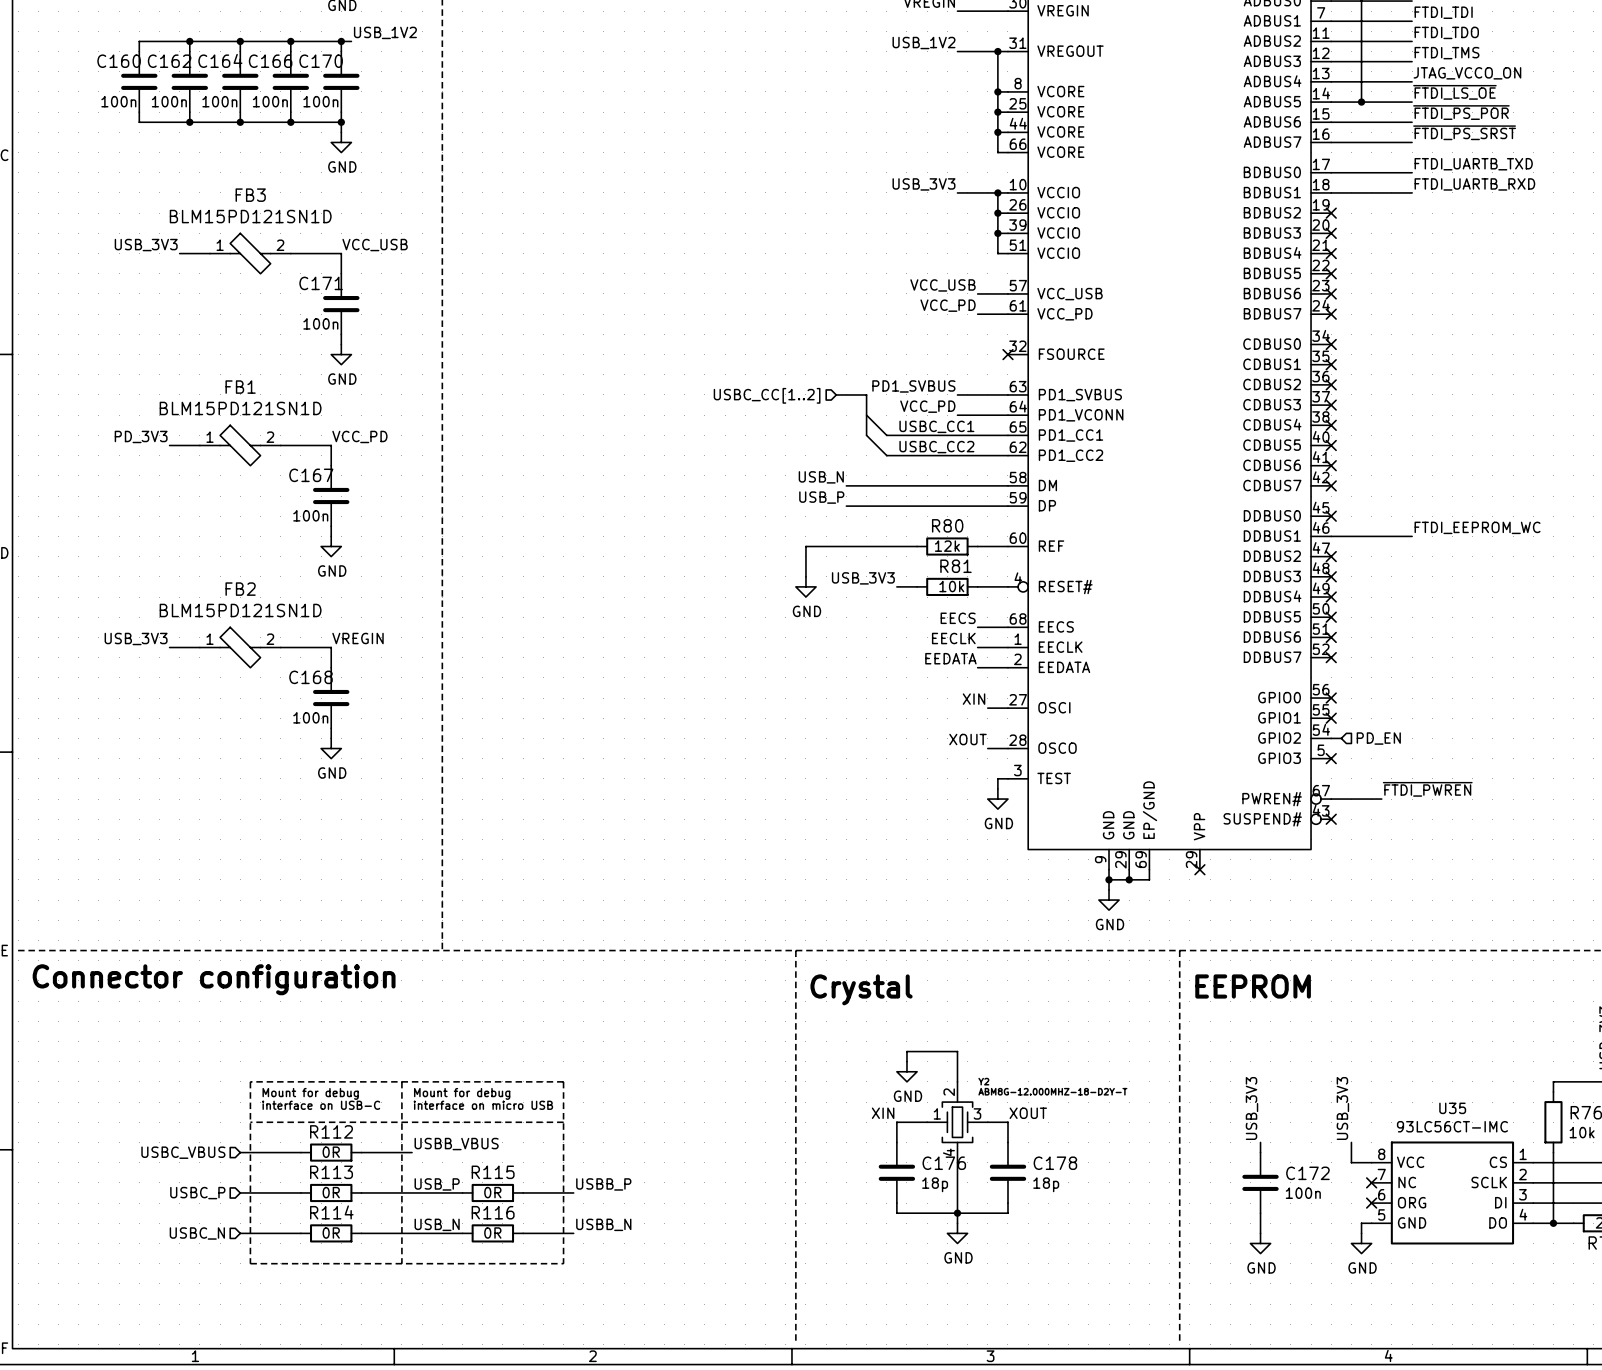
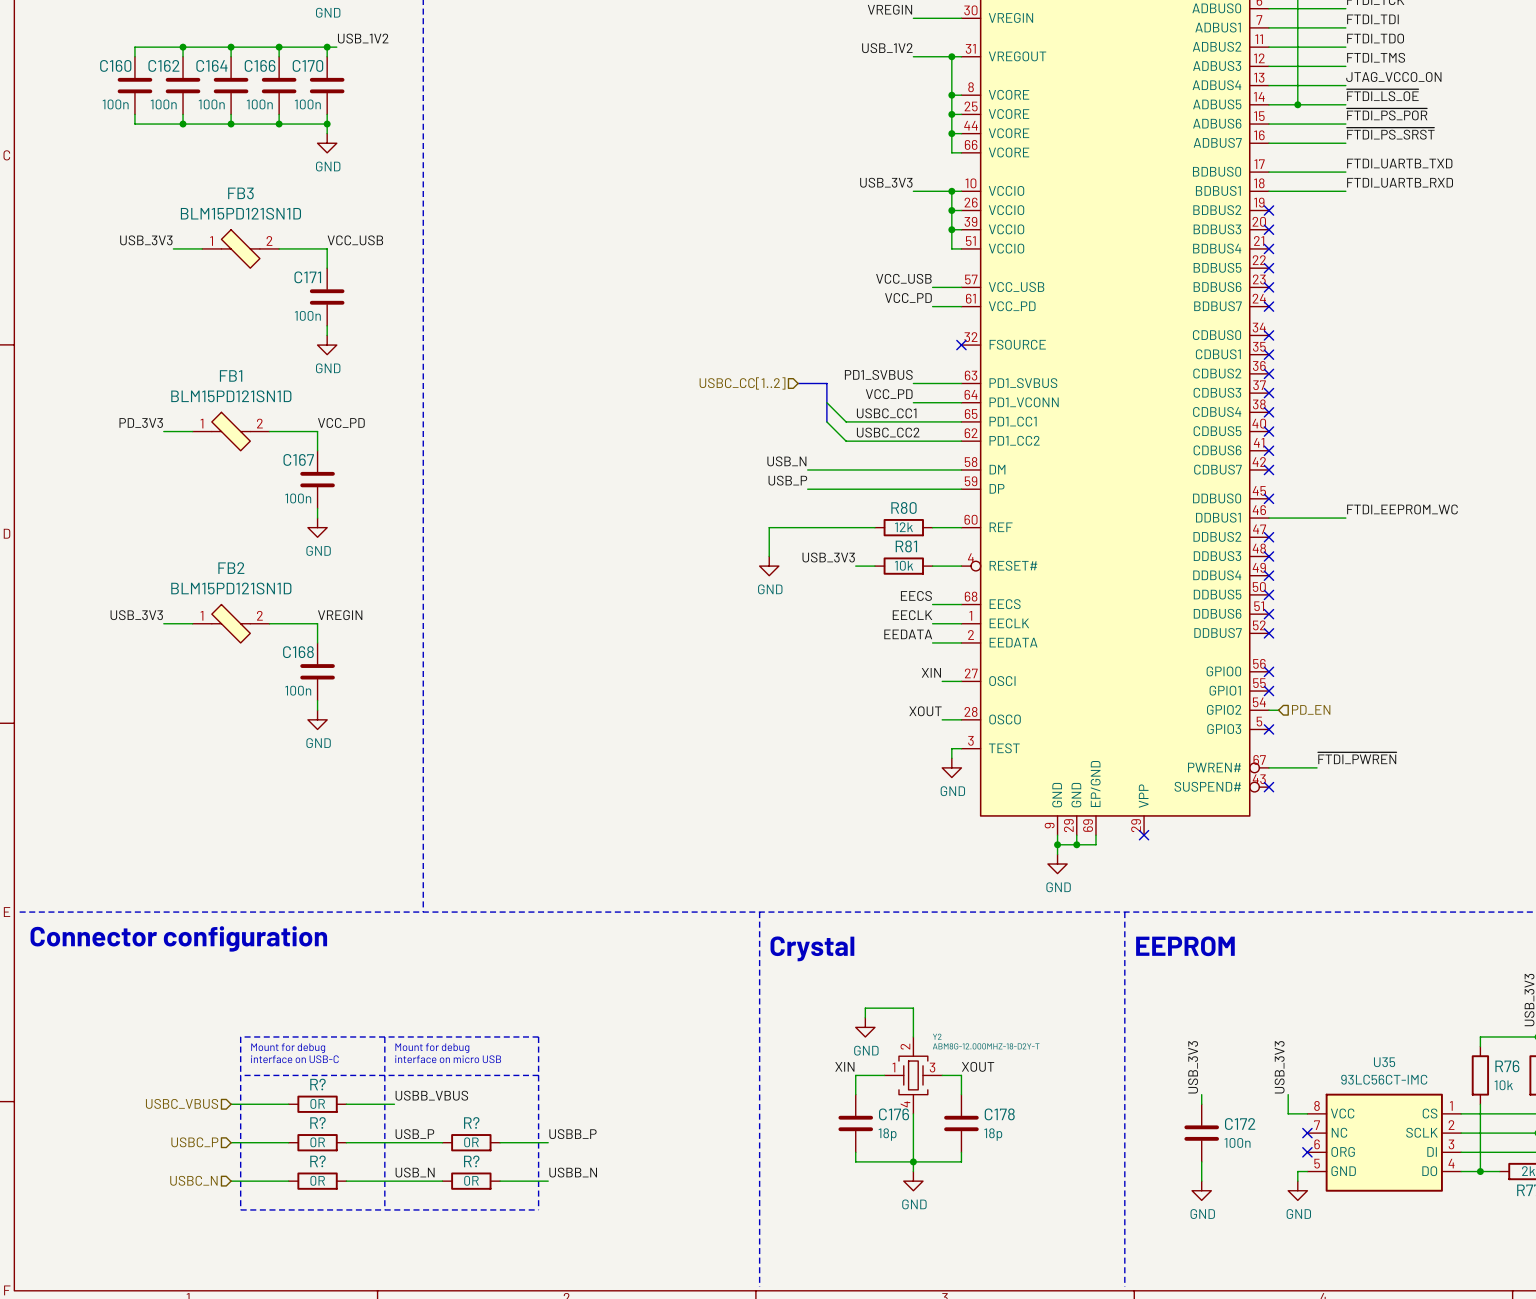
R112 name: R112 (331, 1131) -> R? (317, 1084)
R113 name: R113 (331, 1172) -> R? (317, 1122)
R115 name: R115 (493, 1172) -> R? (471, 1122)
R114 name: R114 (331, 1212) -> R? (317, 1161)
R116 name: R116 (493, 1212) -> R? (471, 1161)

